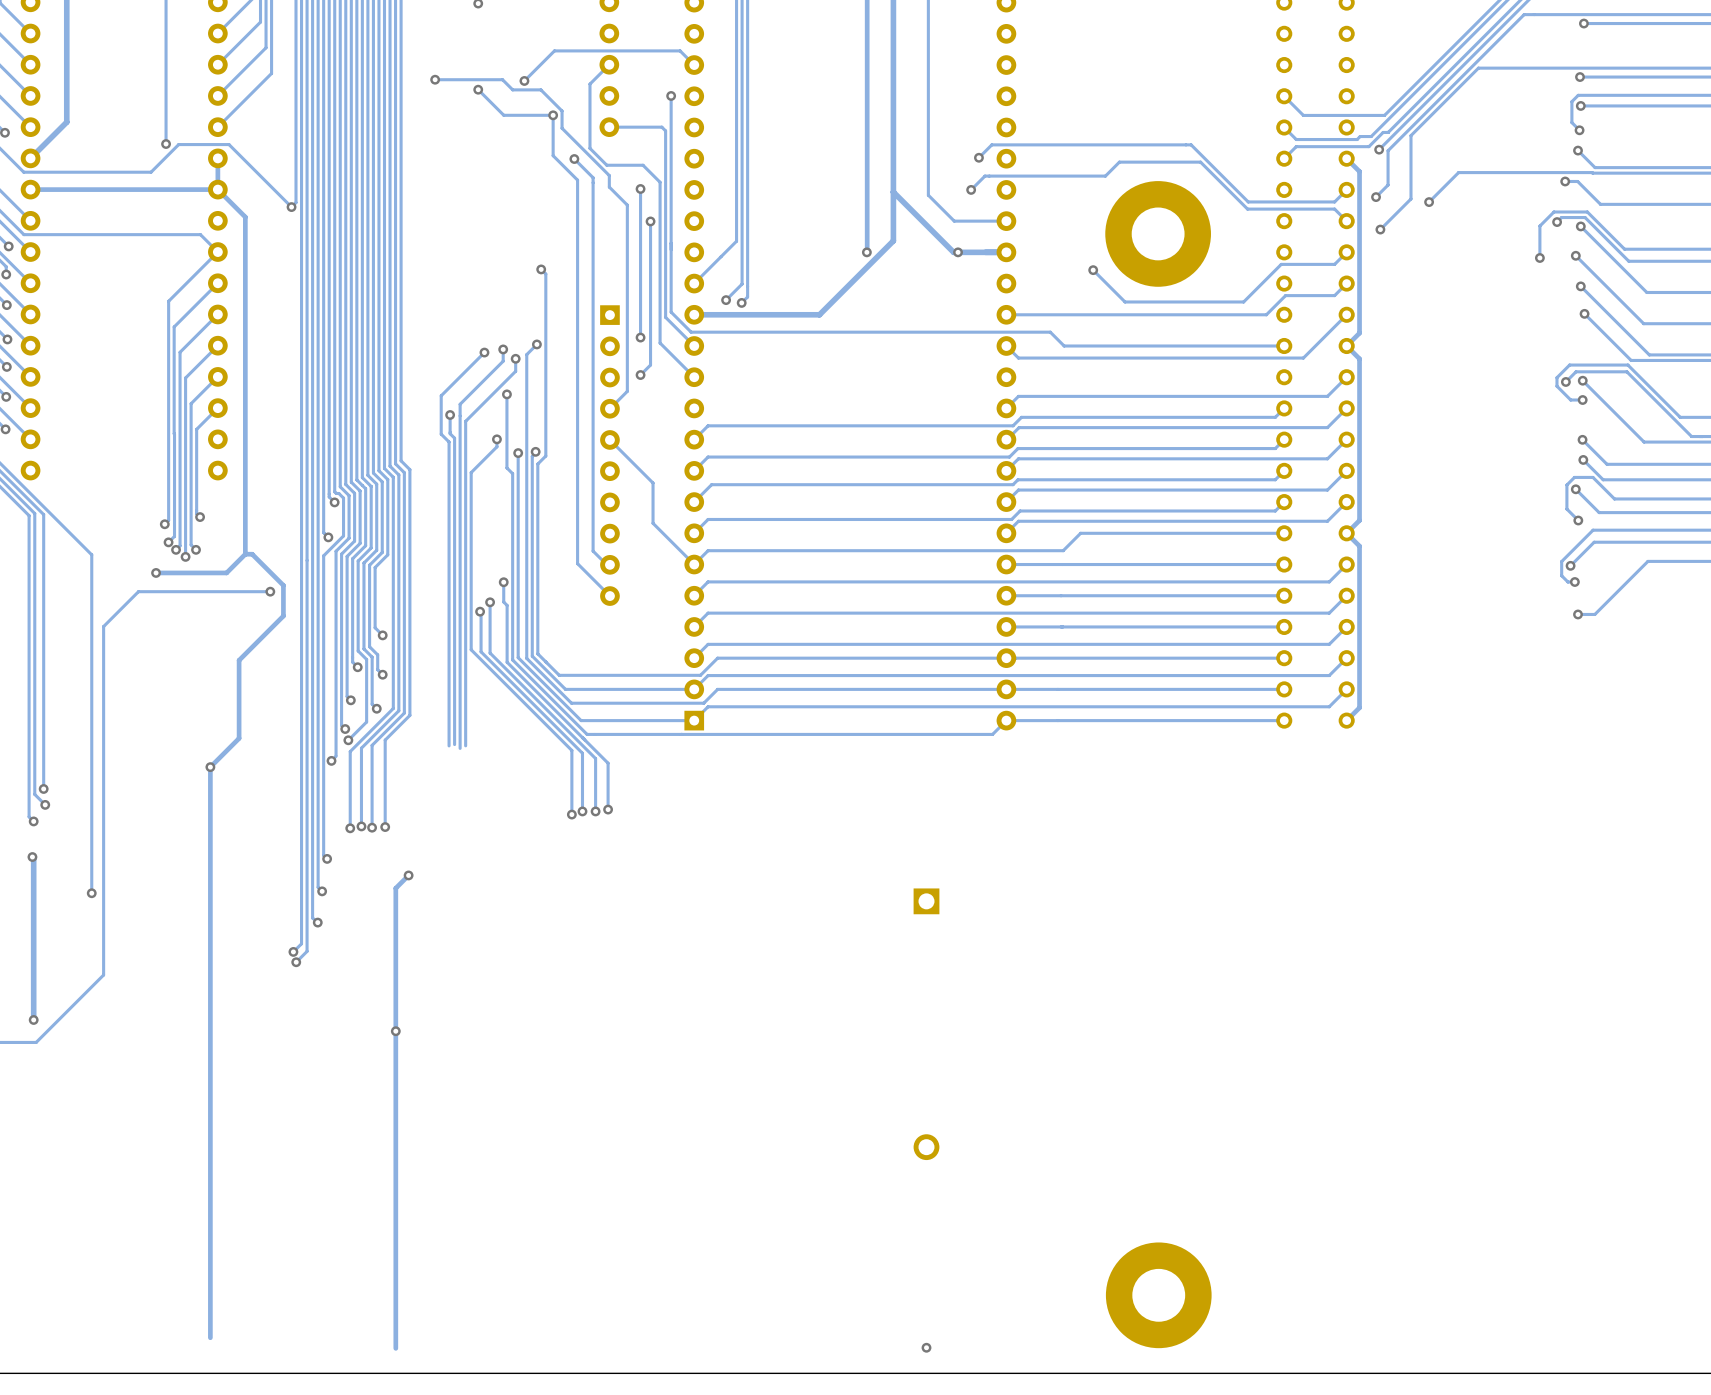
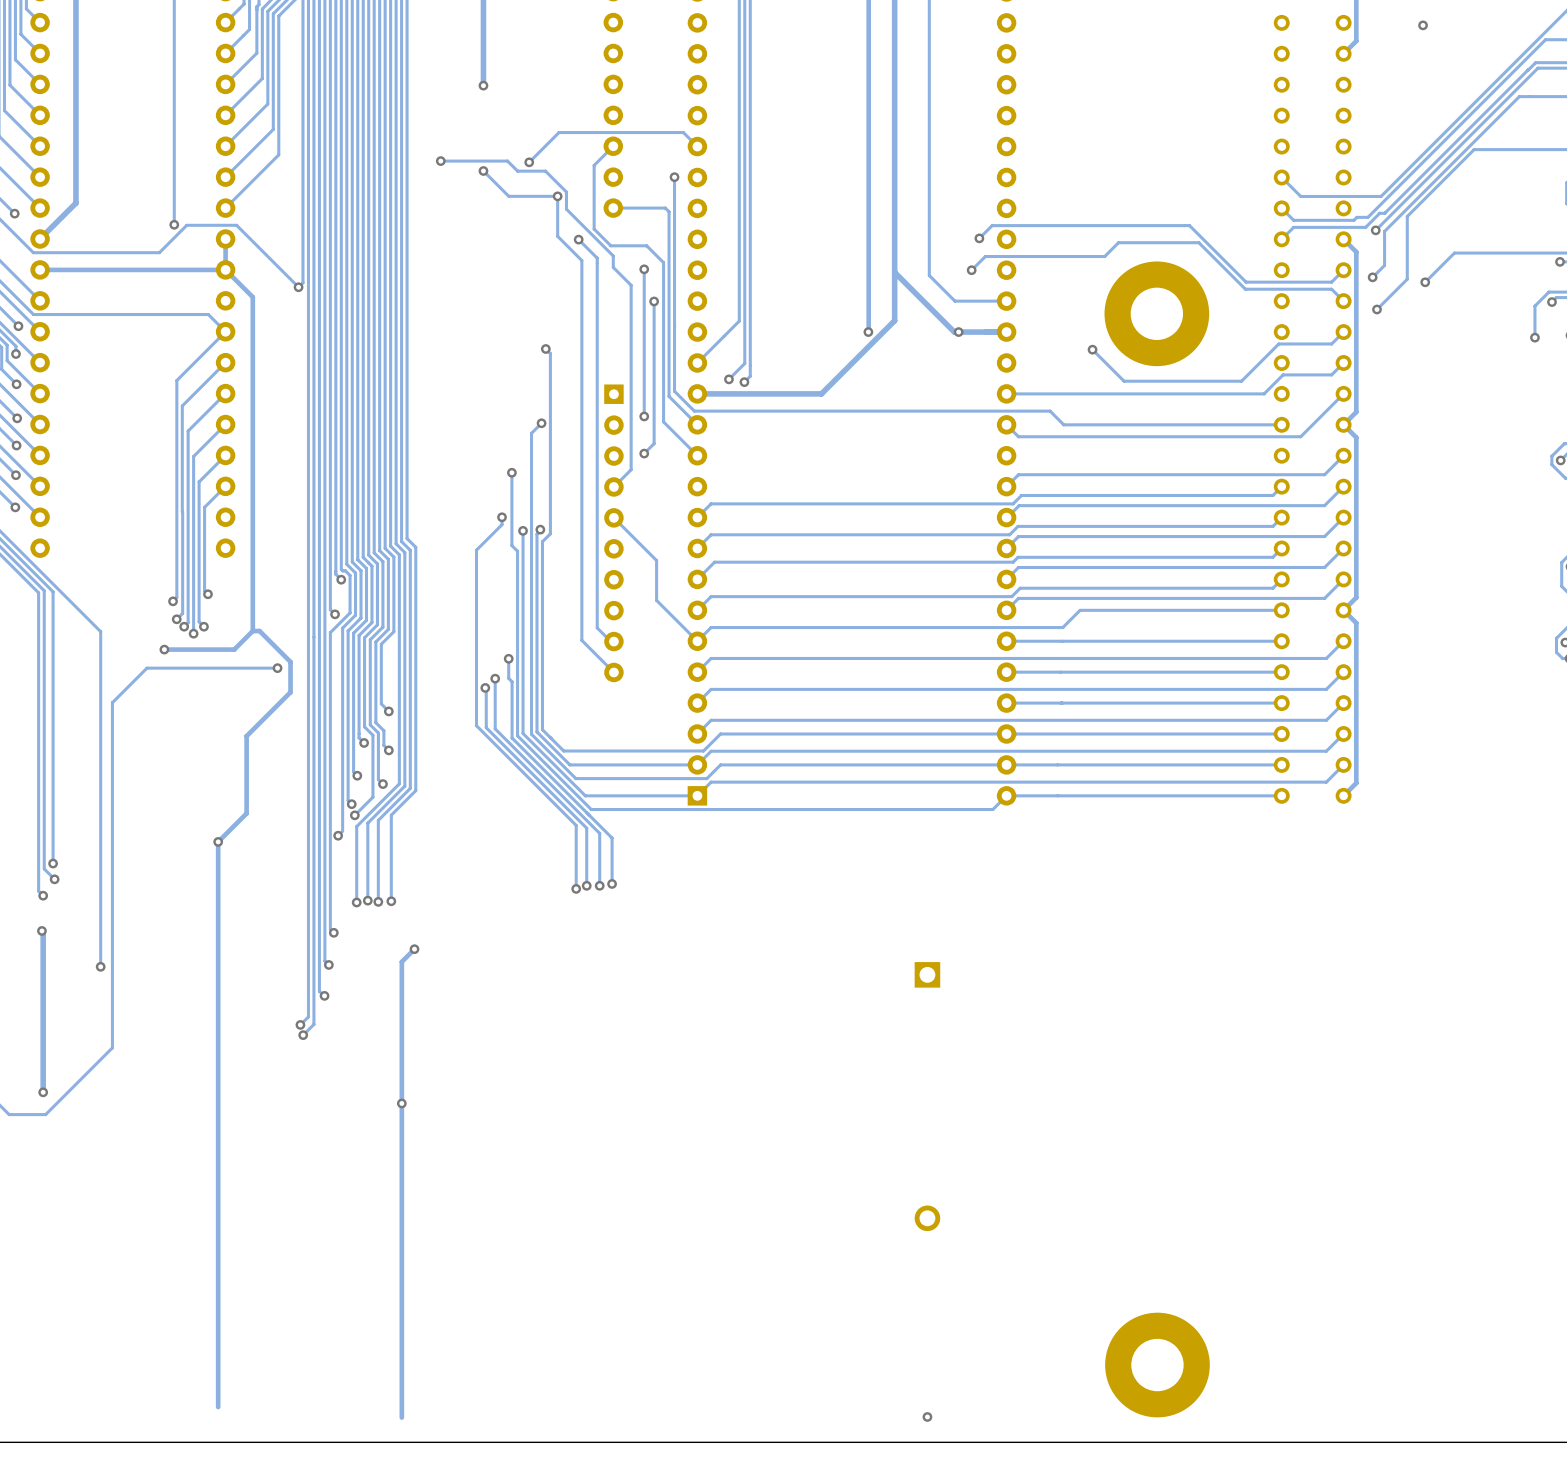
track: (503, 349) (503, 361) (460, 404) (460, 748) -> none
via: (503, 349) -> none
track: (484, 352) (441, 395) (441, 434) (449, 442) (449, 745) -> none
via: (484, 352) -> none
track: (515, 358) (515, 371) (465, 421) (465, 745) -> none
via: (515, 358) -> none
track: (450, 414) (450, 433) (454, 438) (454, 744) -> none
via: (450, 414) -> none

